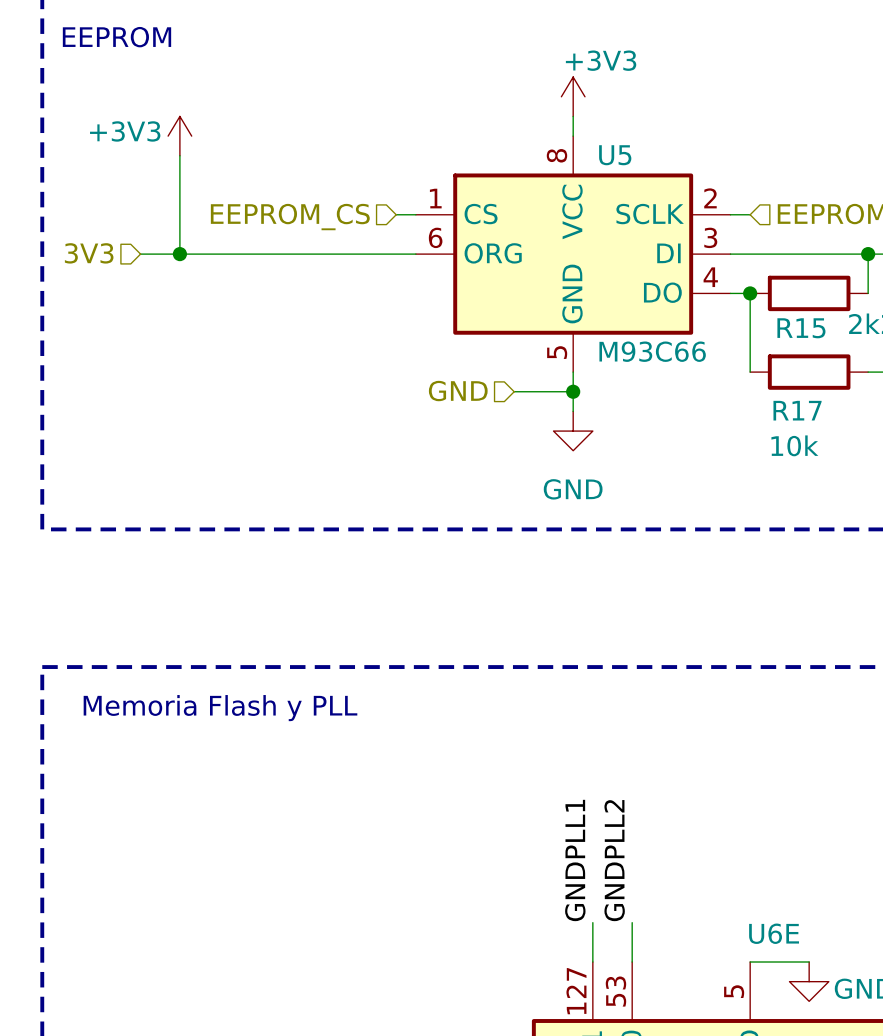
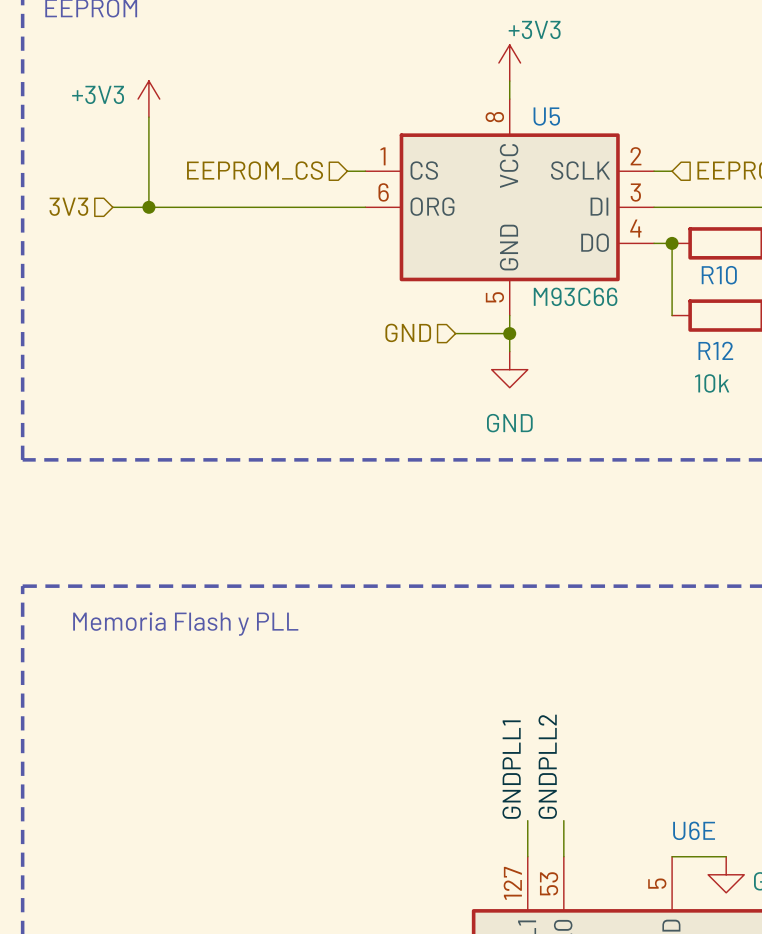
R15 name: R15 (801, 328) -> R10 (719, 275)
R17 name: R17 (797, 410) -> R12 (715, 350)

